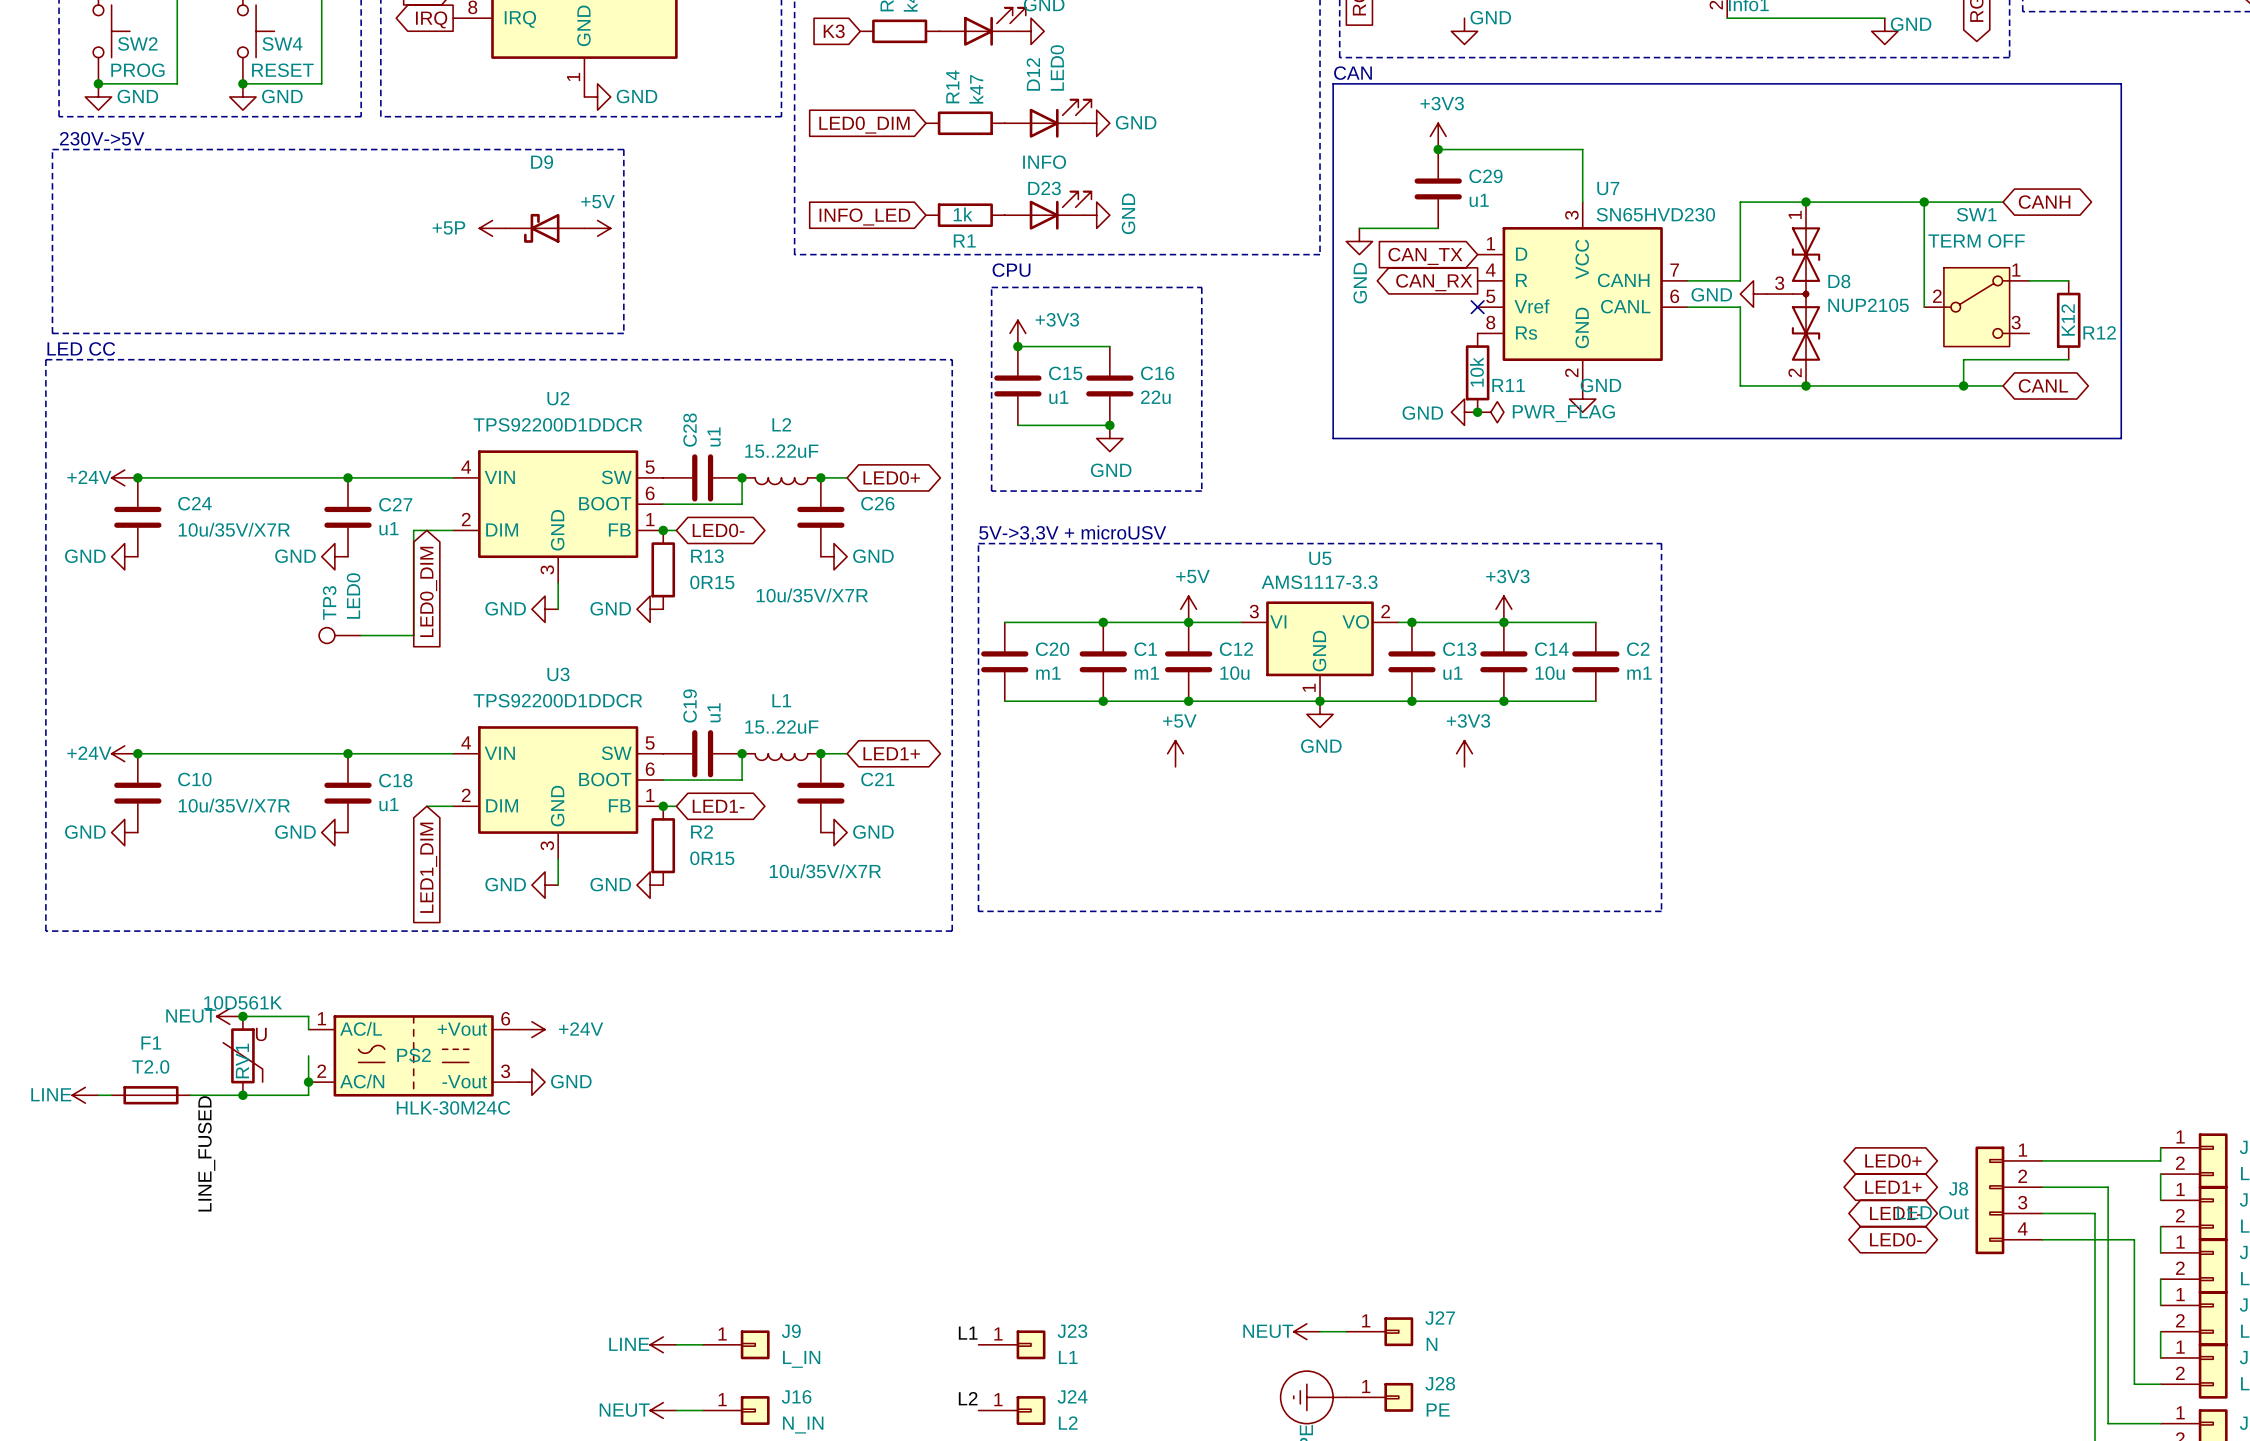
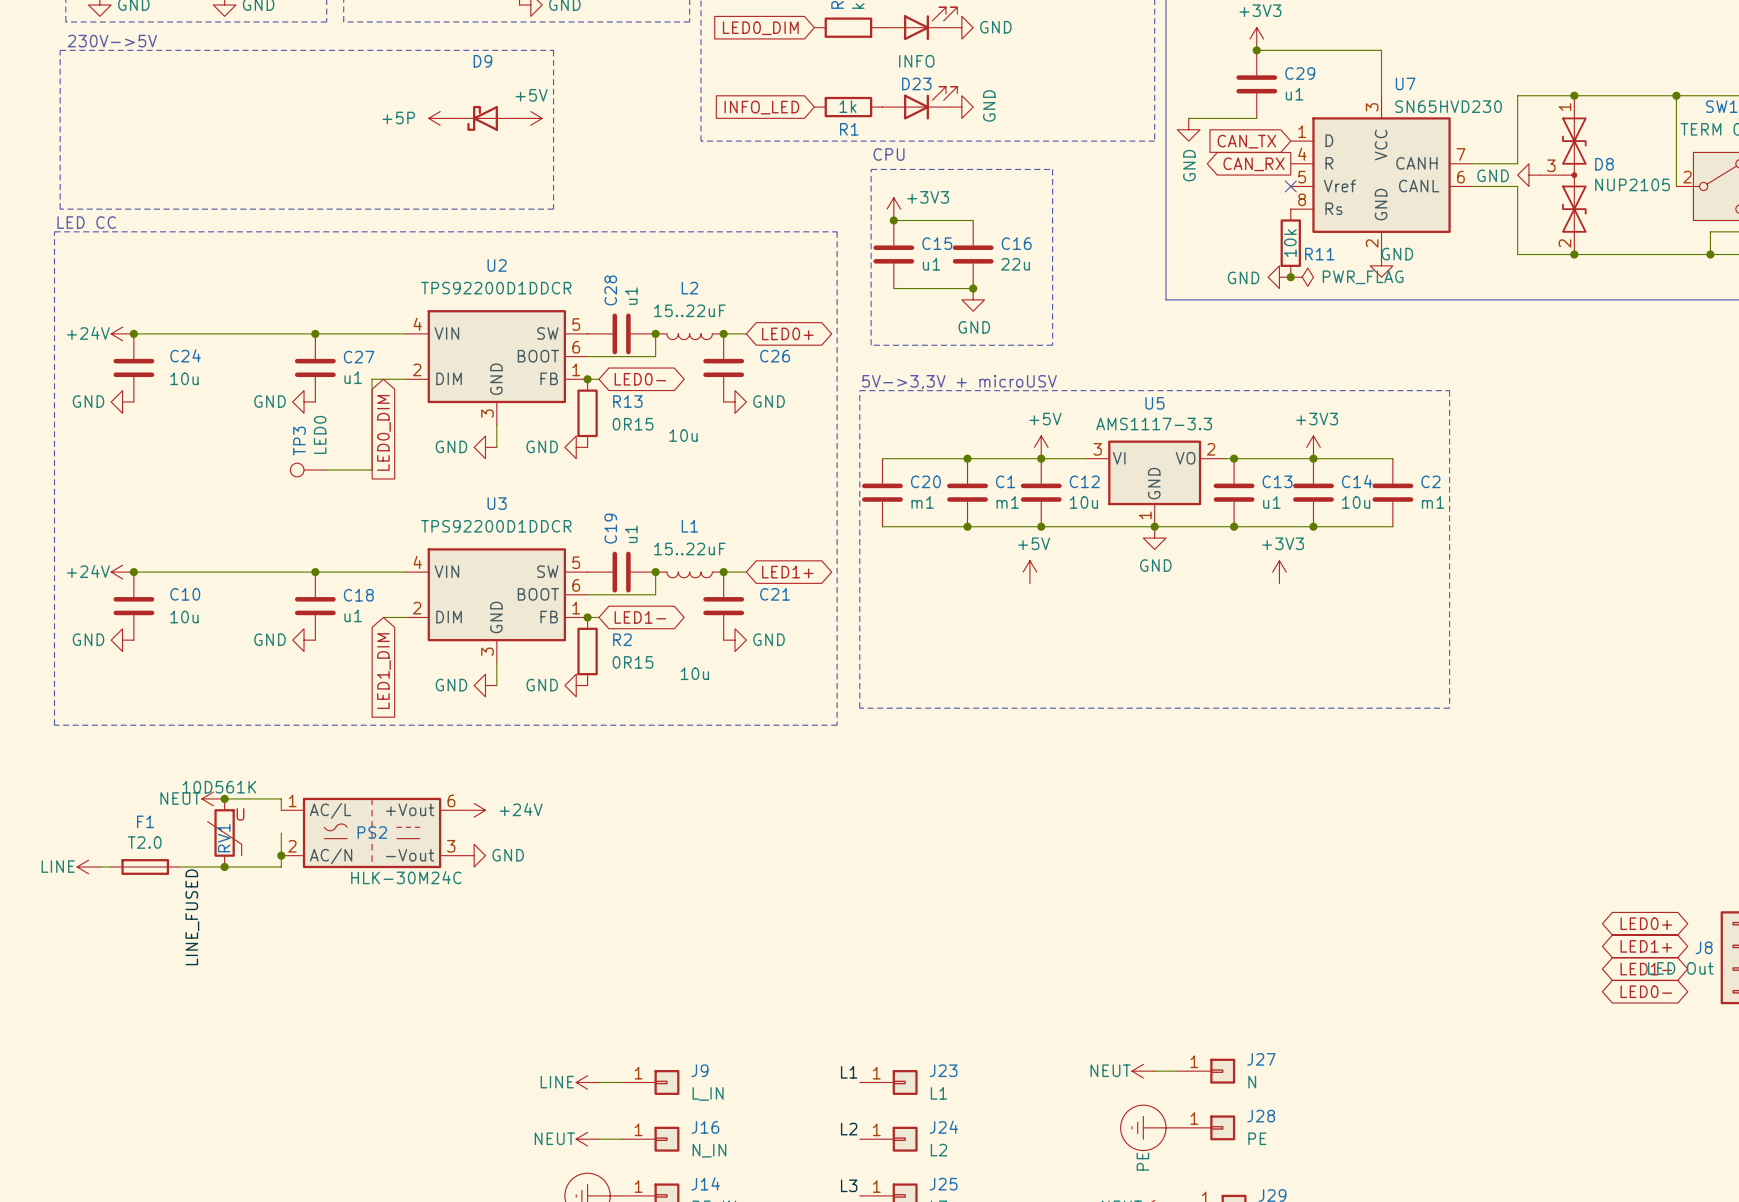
C24 value: 10u/35V/X7R (234, 529) -> 10u (184, 378)
C26 value: 10u/35V/X7R (812, 595) -> 10u (683, 435)
C10 value: 10u/35V/X7R (234, 805) -> 10u (184, 617)
C21 value: 10u/35V/X7R (825, 871) -> 10u (694, 673)

